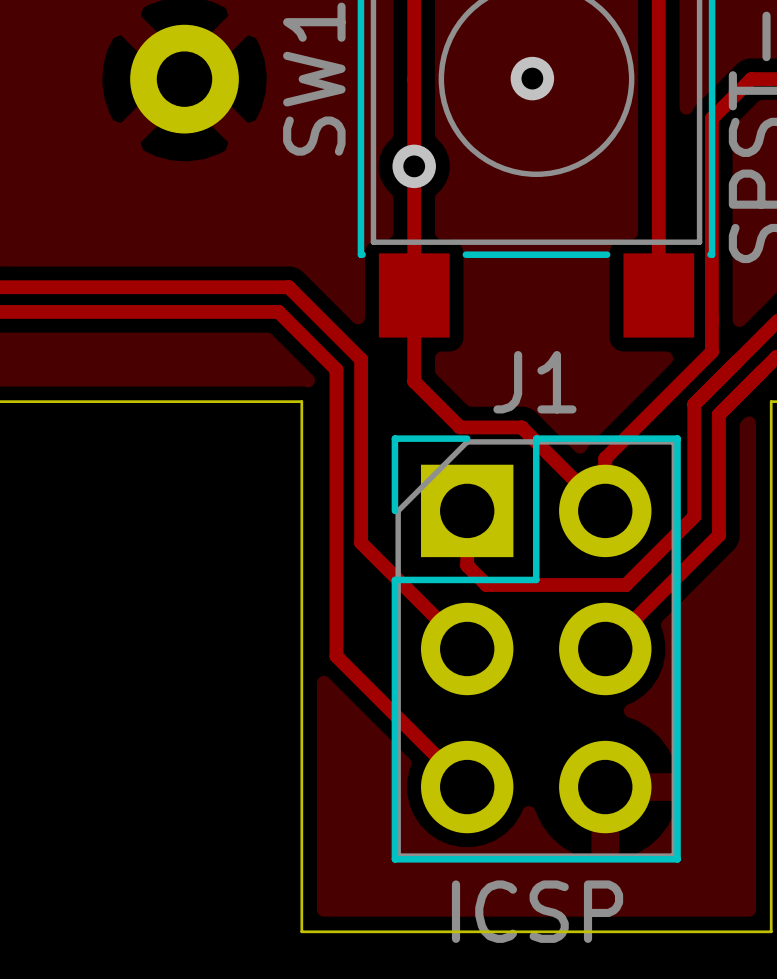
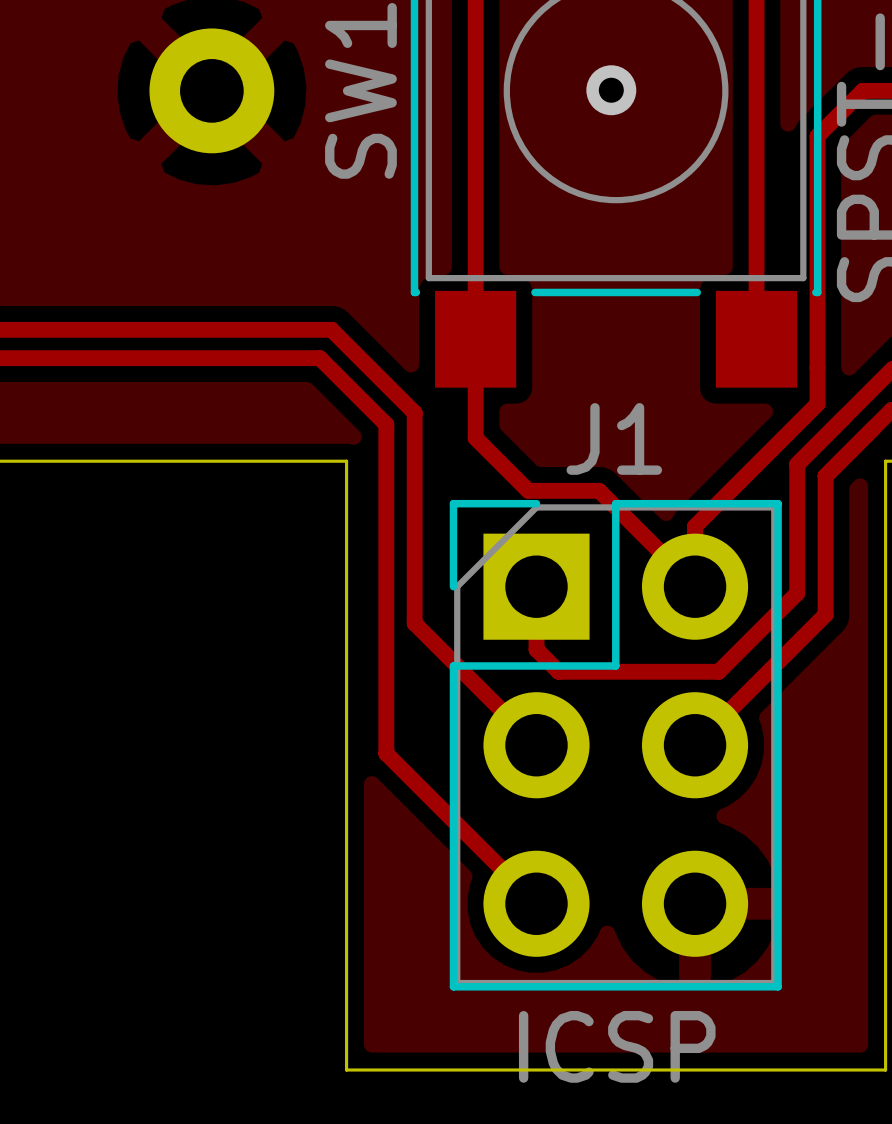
via: (414, 166) -> none

